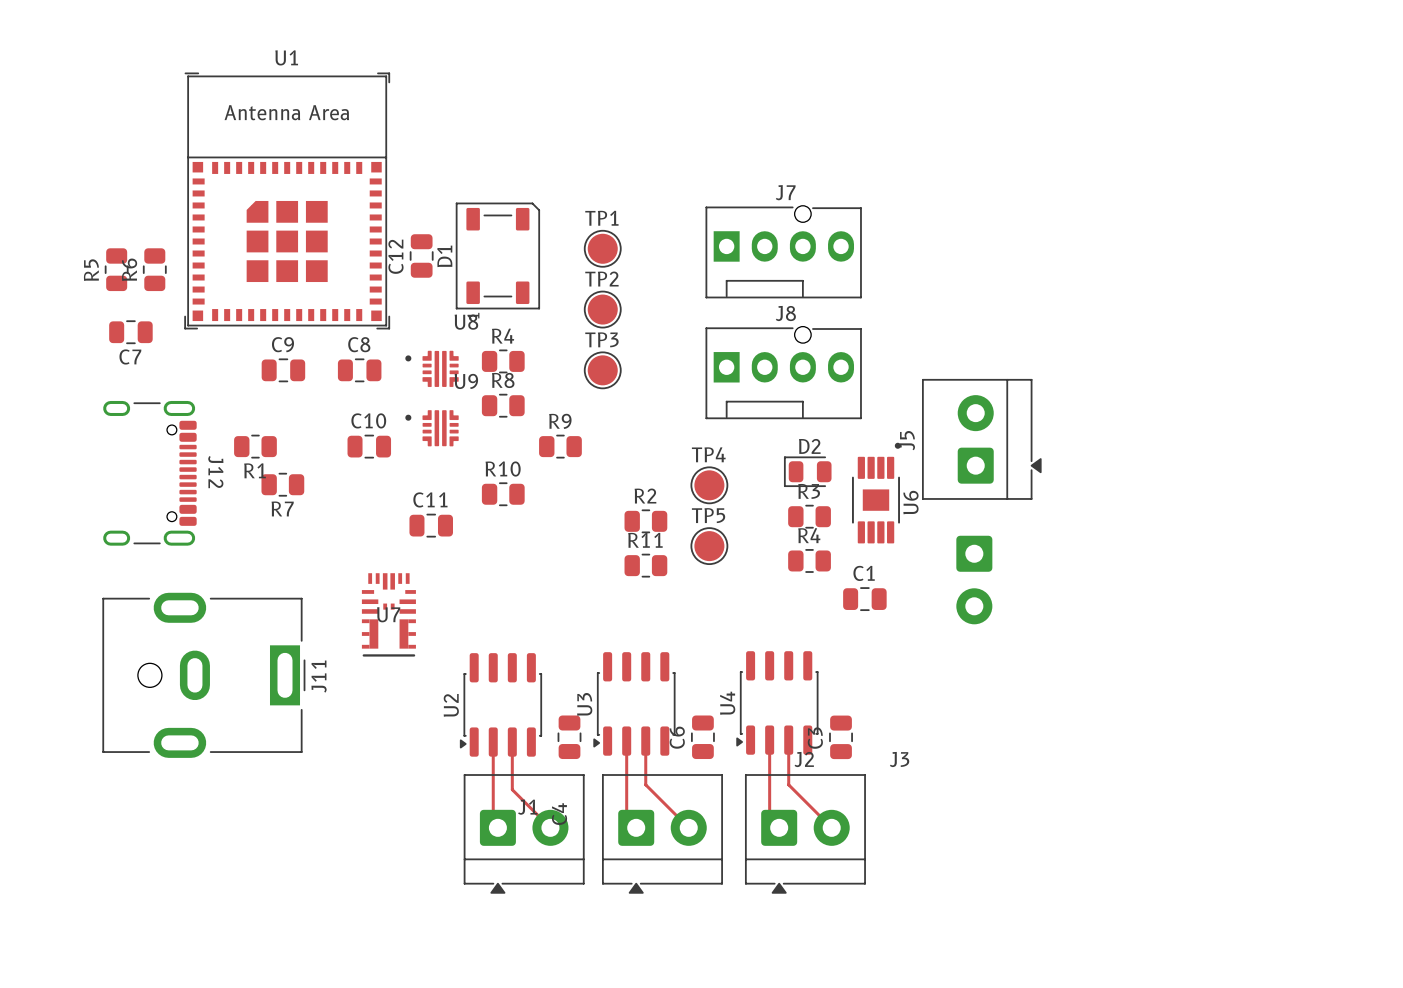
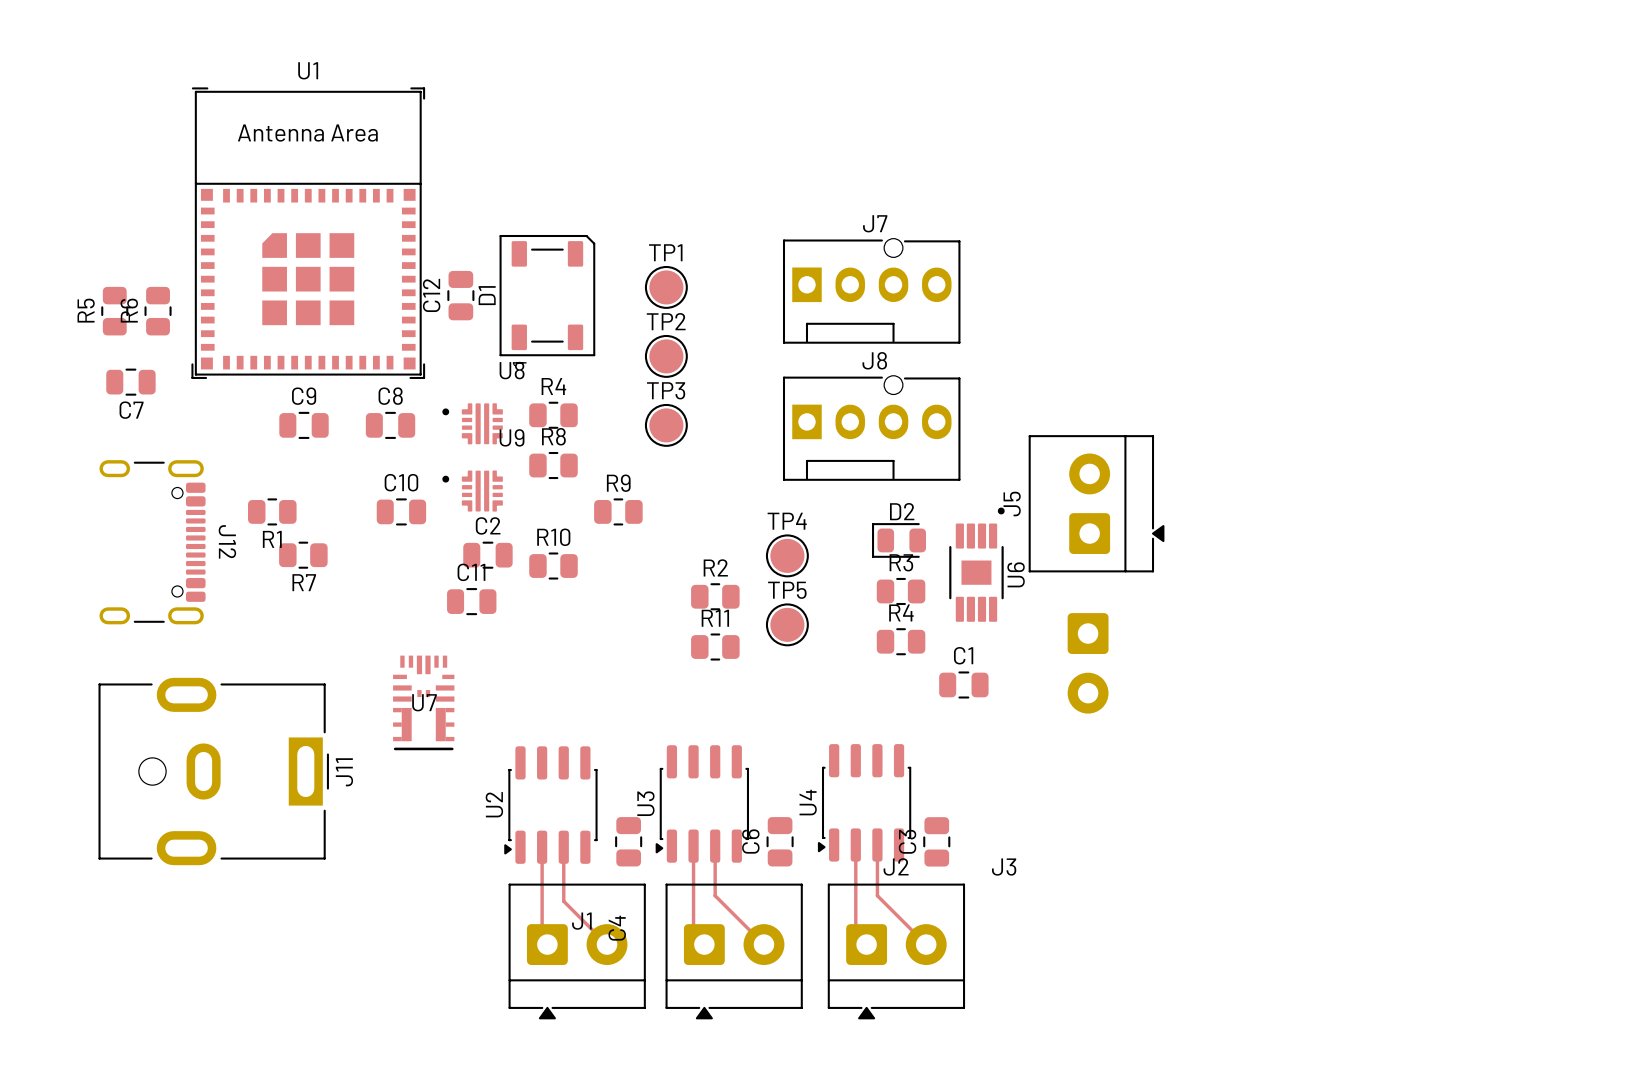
C2: none -> (487, 555)

